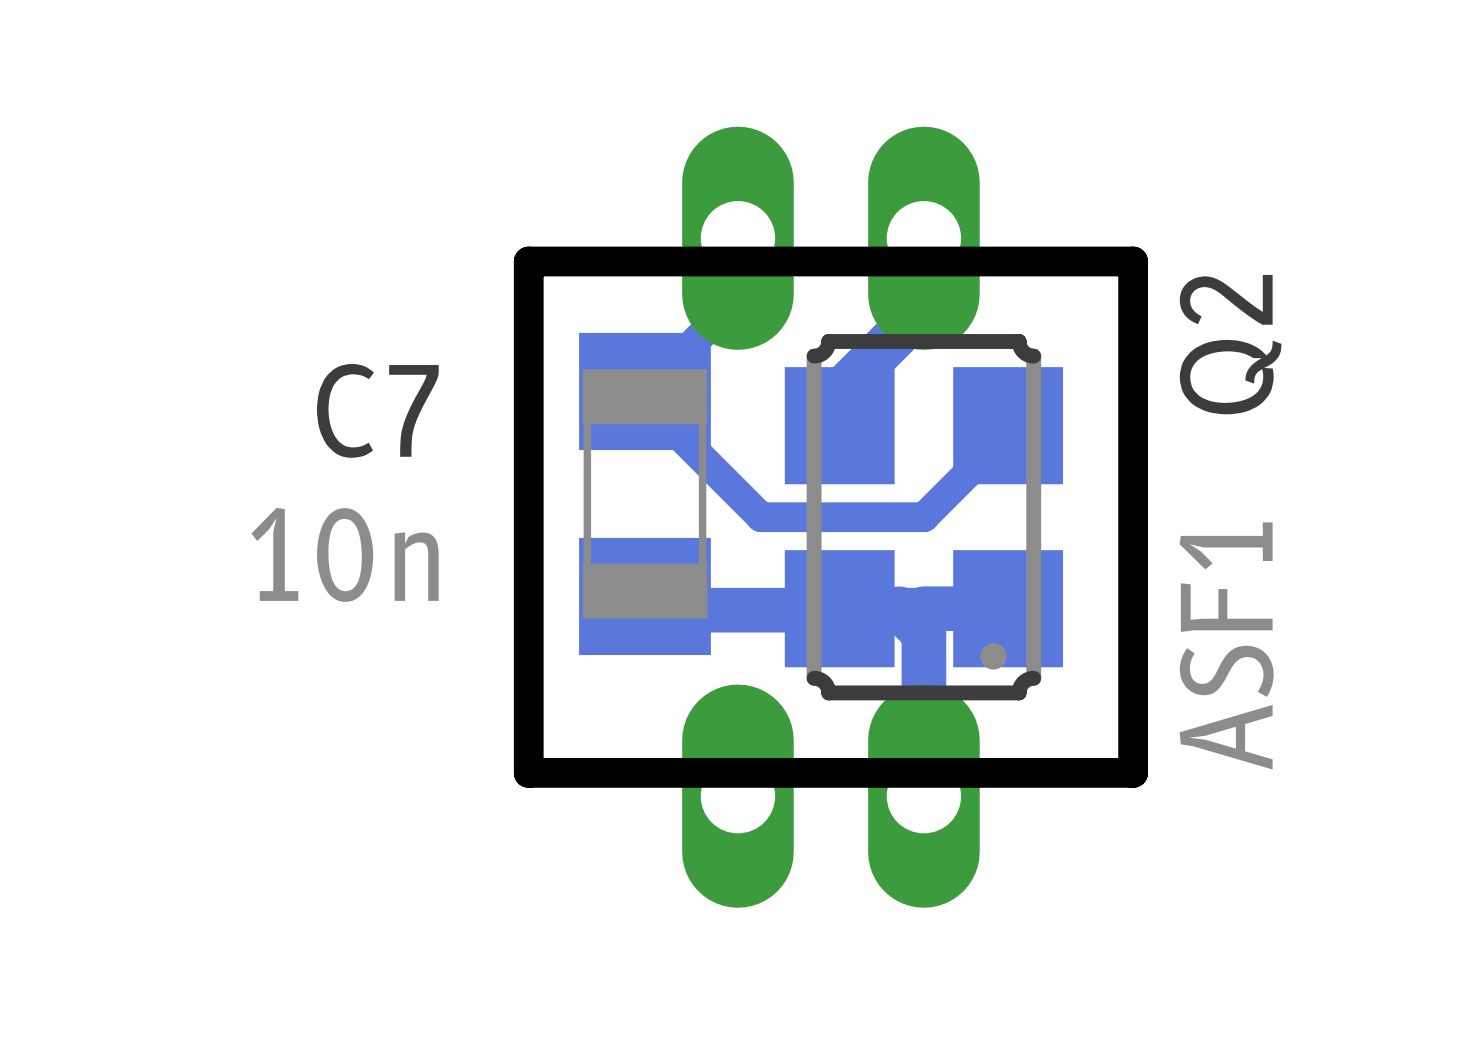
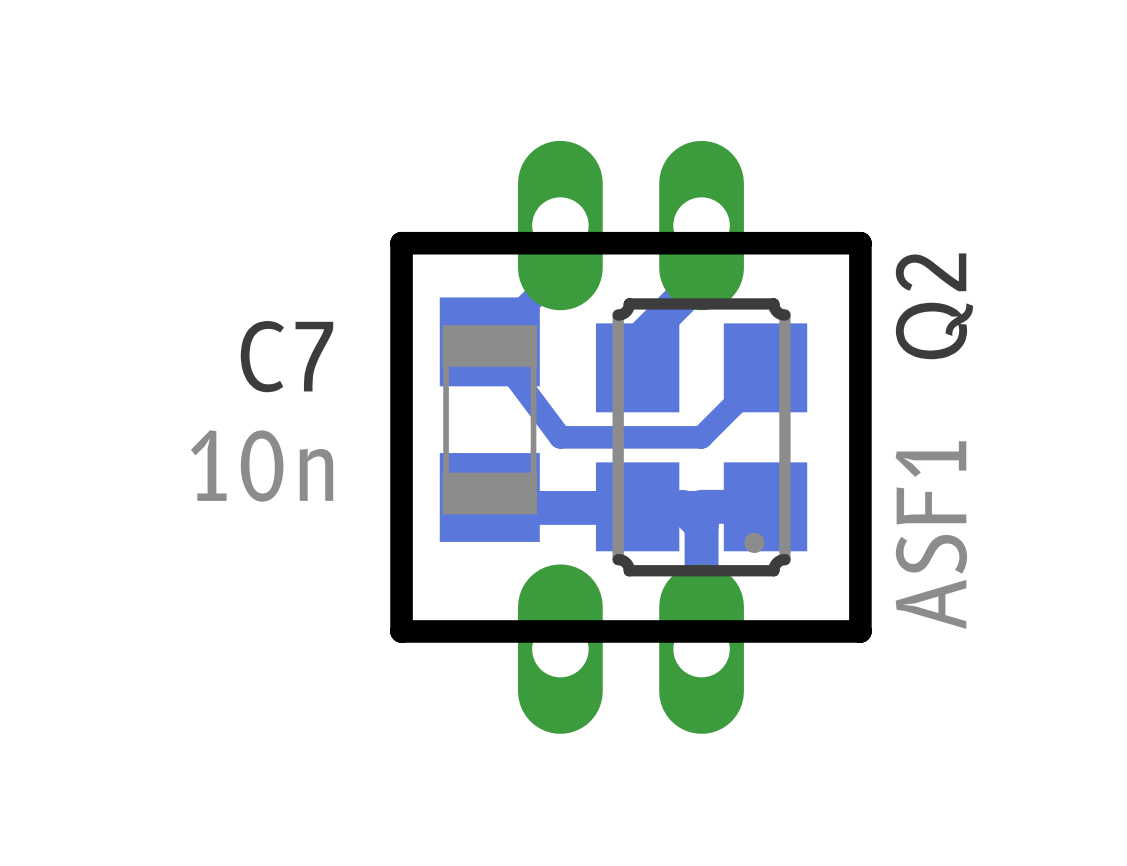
bottom track: (668, 424) (761, 517) -> (507, 366) (560, 437) (578, 437)

